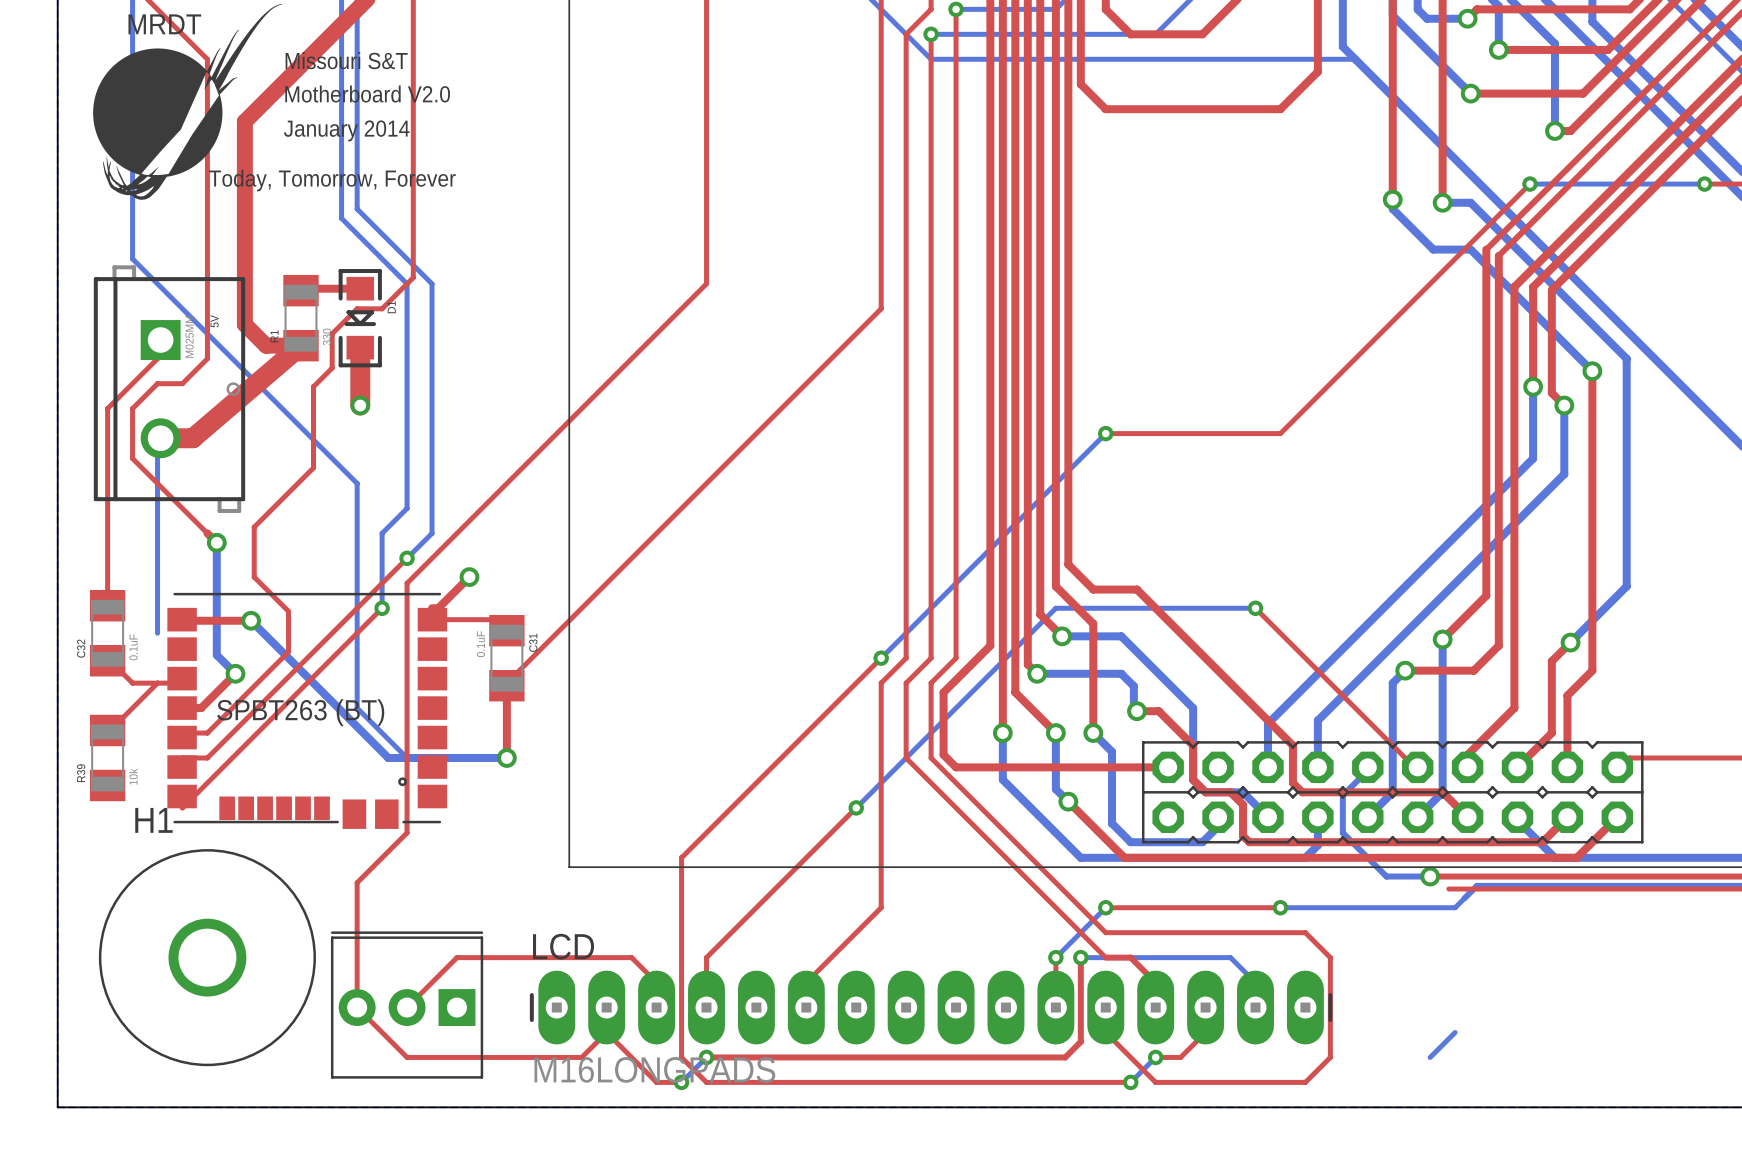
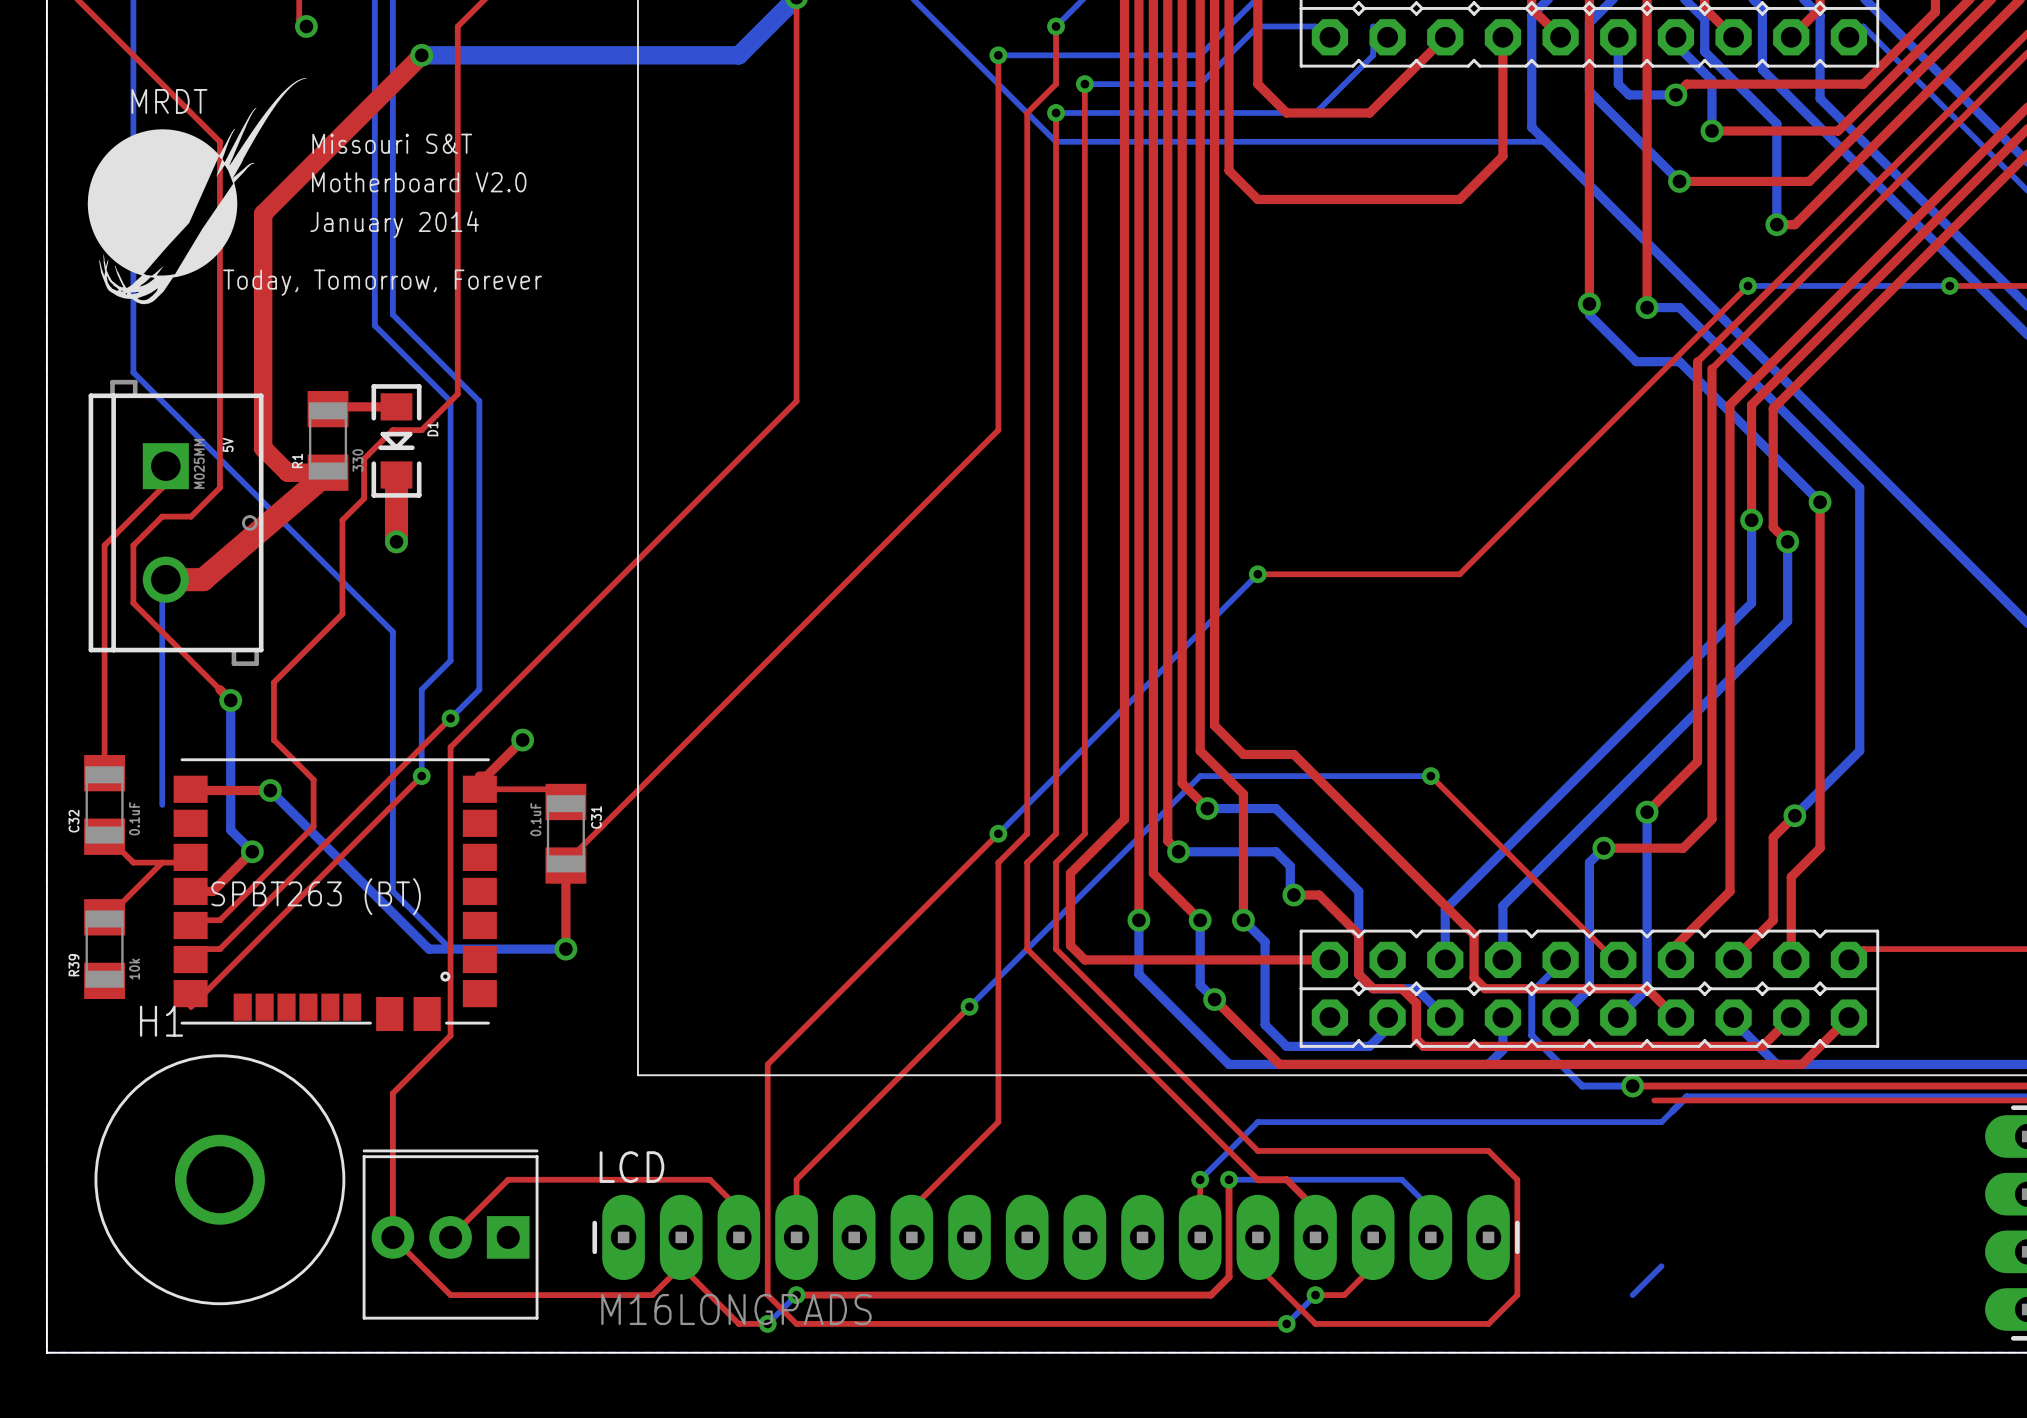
top track: (1105, 907) (1280, 907) -> none
bottom track: none -> (1257, 1122) (1459, 1122)
via: (1105, 907) -> none
via: (1280, 907) -> none

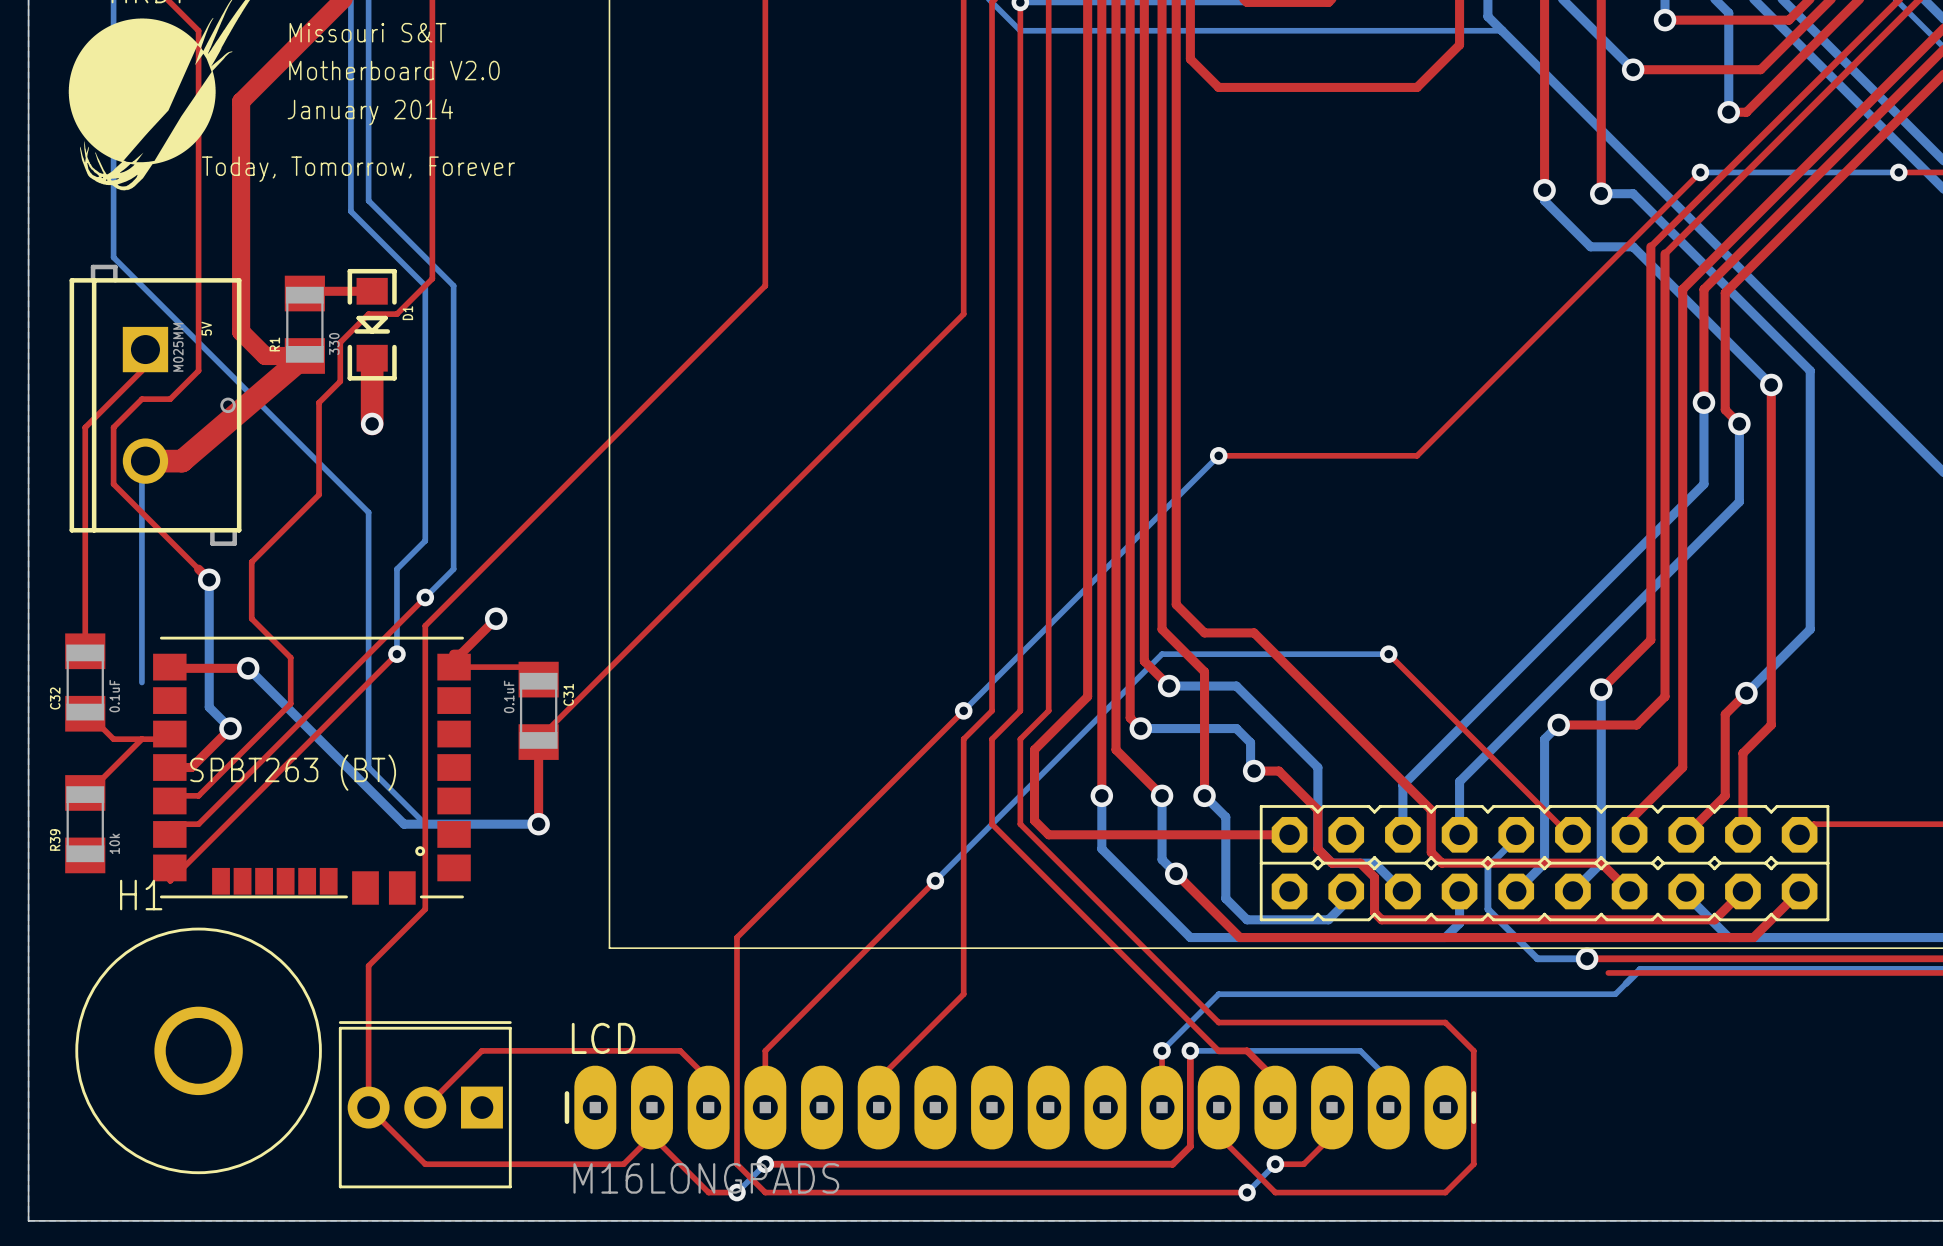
bottom track: (1661, 1266) (1632, 1295) -> none

